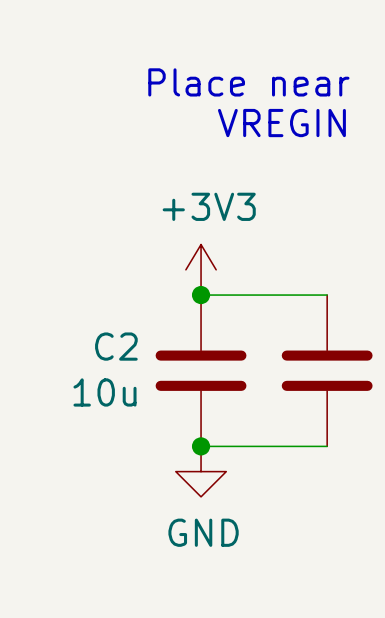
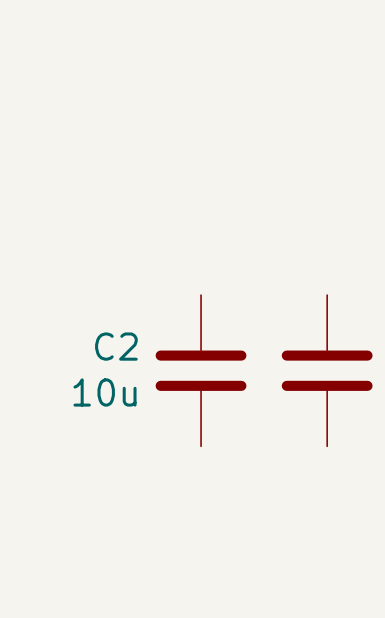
text: Place near (248, 82) -> none
text: VREGIN (281, 123) -> none
power symbol: +3V3 (201, 269) -> none
wire: (201, 295) (327, 295) -> none
junction: (201, 295) -> none
wire: (201, 446) (327, 446) -> none
junction: (201, 446) -> none
power symbol: GND (201, 471) -> none

